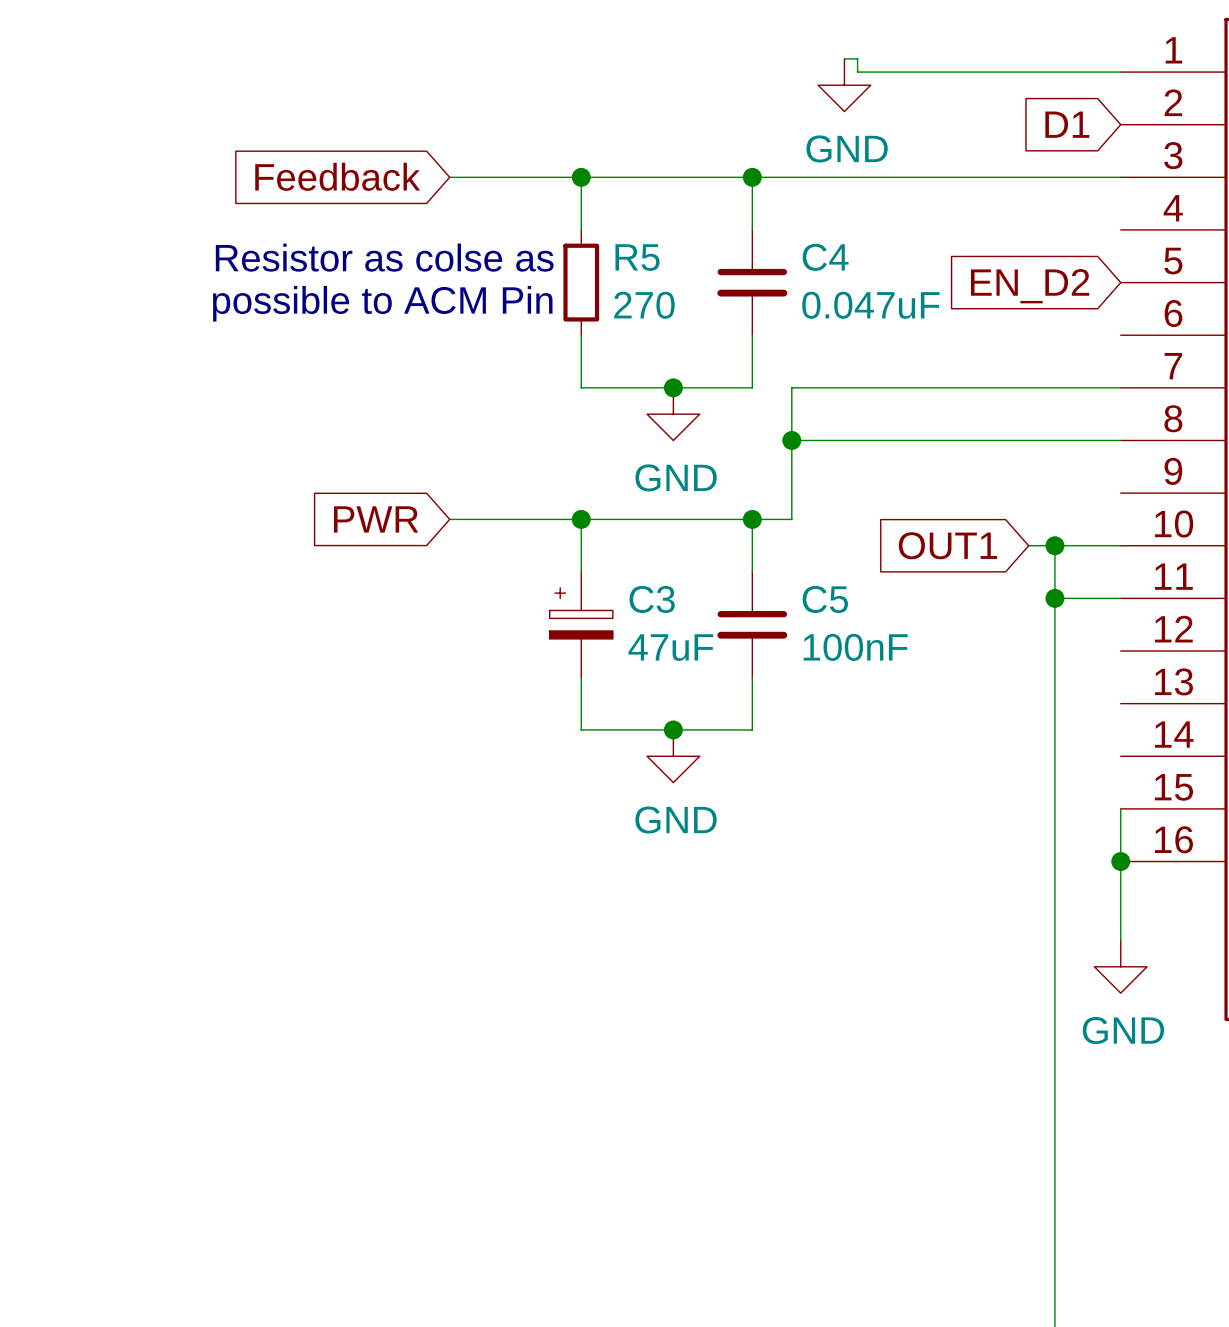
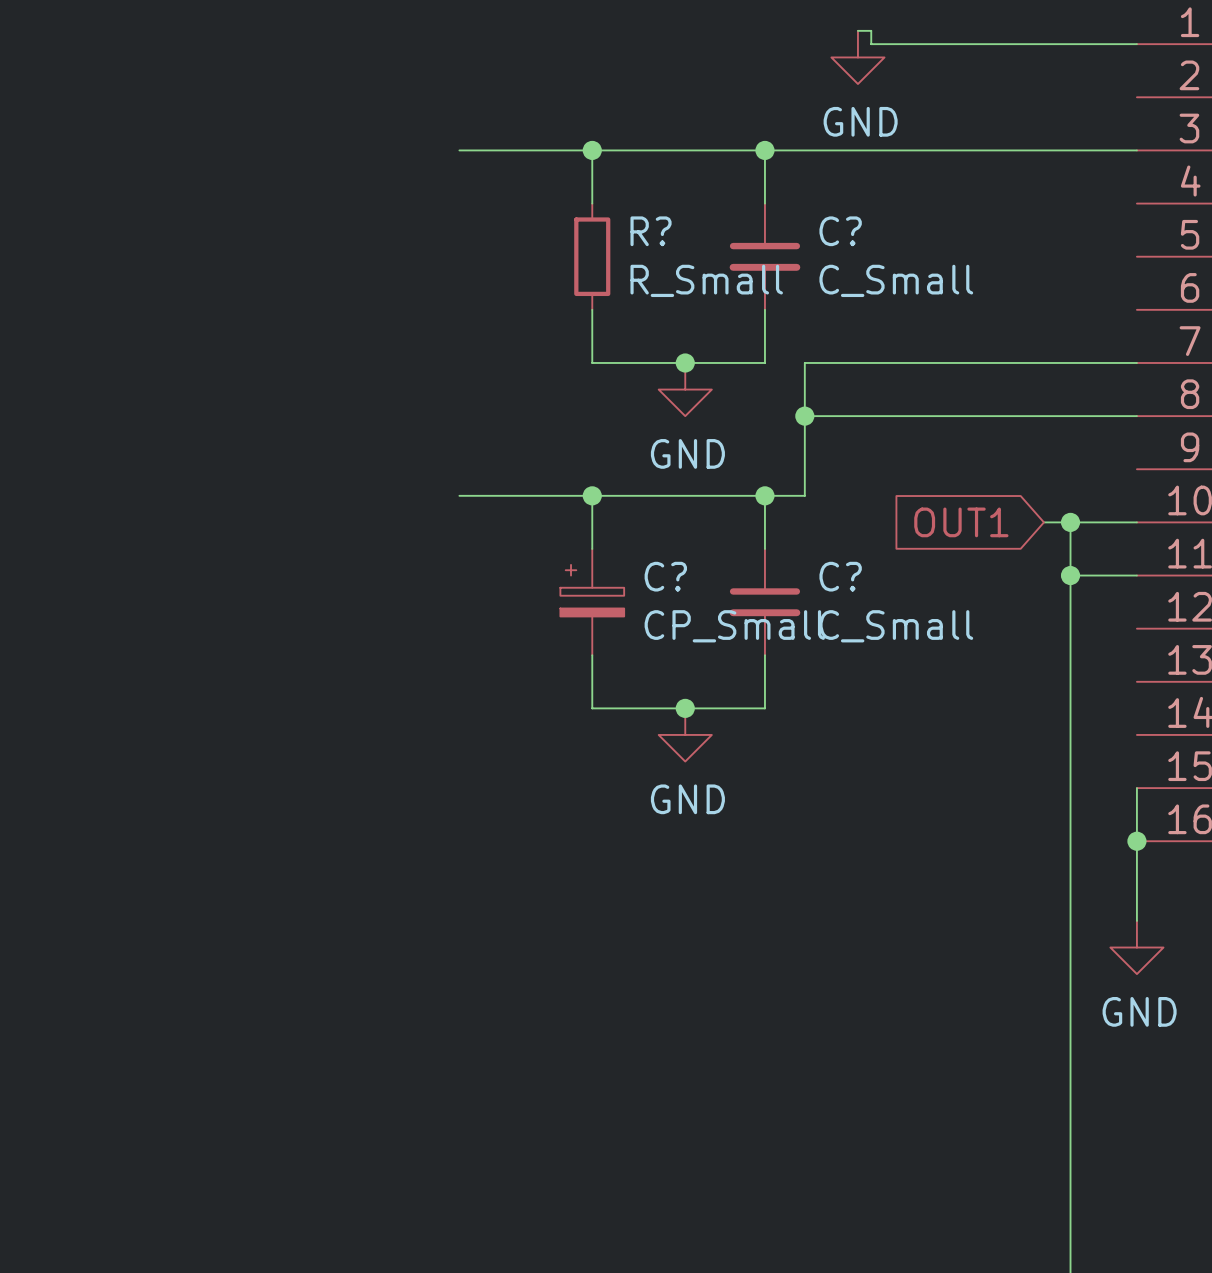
global label: D1 (1067, 124) -> none
global label: Feedback (337, 176) -> none
text: Resistor as colse as (384, 257) -> none
R5 name: R5 (637, 257) -> R? (651, 231)
C4 name: C4 (825, 257) -> C? (840, 231)
global label: EN_D2 (1030, 286) -> none
text: possible to ACM Pin (382, 303) -> none
R5 value: 270 (644, 305) -> R_Small (706, 280)
C4 value: 0.047uF (870, 305) -> C_Small (896, 280)
global label: PWR (376, 519) -> none
C3 name: C3 (652, 599) -> C? (665, 576)
C5 name: C5 (825, 599) -> C? (840, 576)
C3 value: 47uF (670, 647) -> CP_Small (734, 626)
C5 value: 100nF (855, 647) -> C_Small (896, 626)

